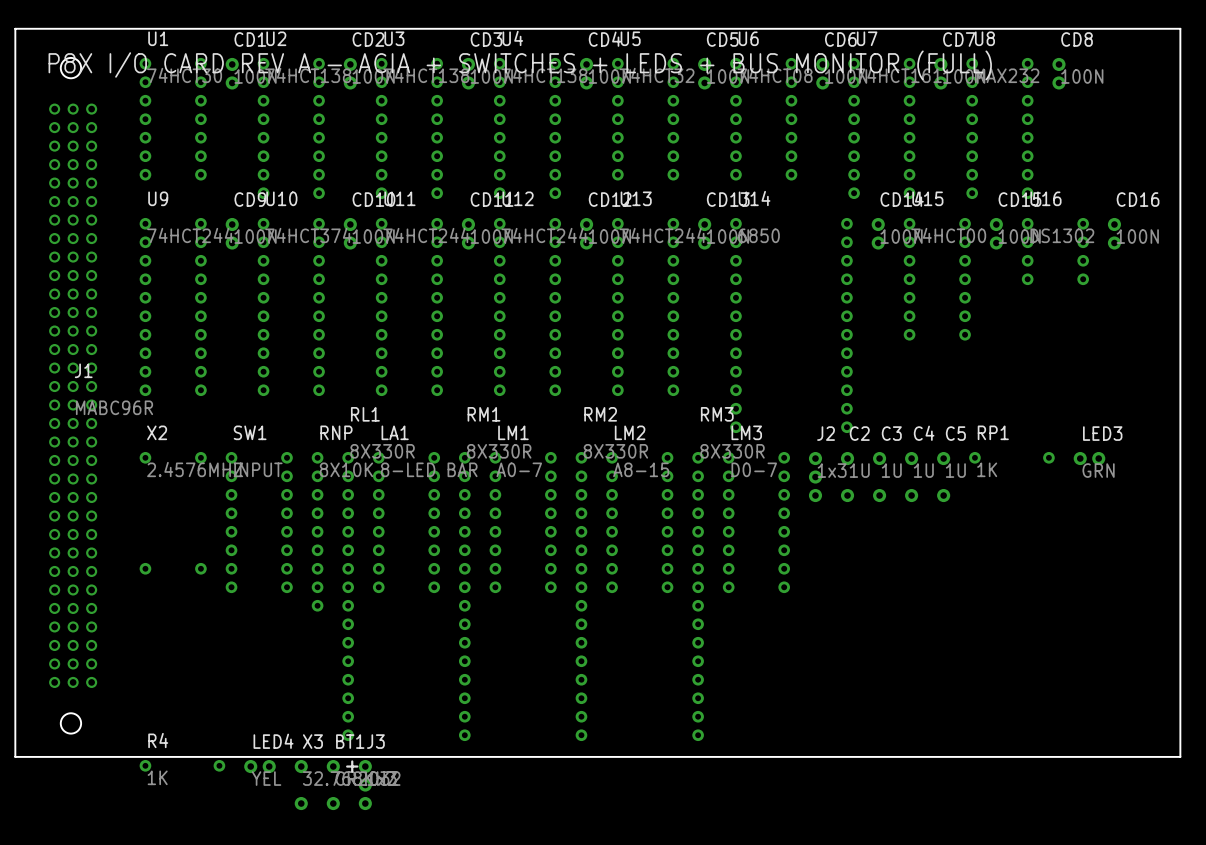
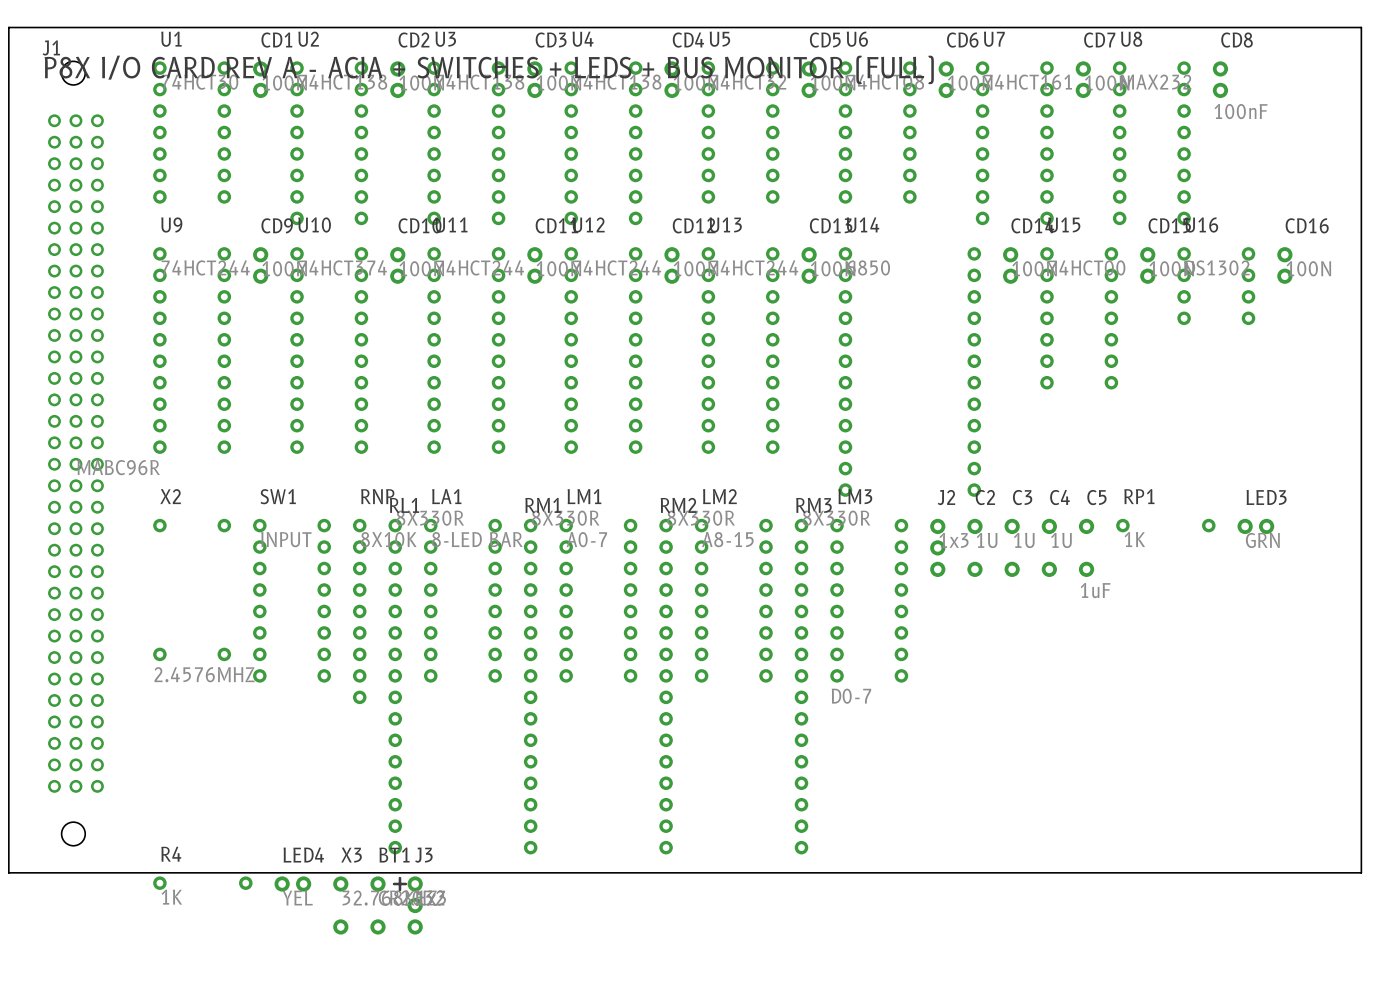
CD8 value: 100N (1082, 76) -> 100nF (1241, 111)
J1 name position: J1 (83, 370) -> J1 (51, 47)
RL1 name position: RL1 (365, 414) -> RL1 (404, 505)
RM1 name position: RM1 (483, 414) -> RM1 (543, 505)
RM2 name position: RM2 (600, 414) -> RM2 (678, 505)
RM3 name position: RM3 (717, 414) -> RM3 (813, 505)
X2 value position: 2.4576MHZ (195, 469) -> 2.4576MHZ (204, 674)
LM3 value position: D0-7 (754, 469) -> D0-7 (851, 696)
C5 value: 1U (955, 470) -> 1uF (1095, 590)

